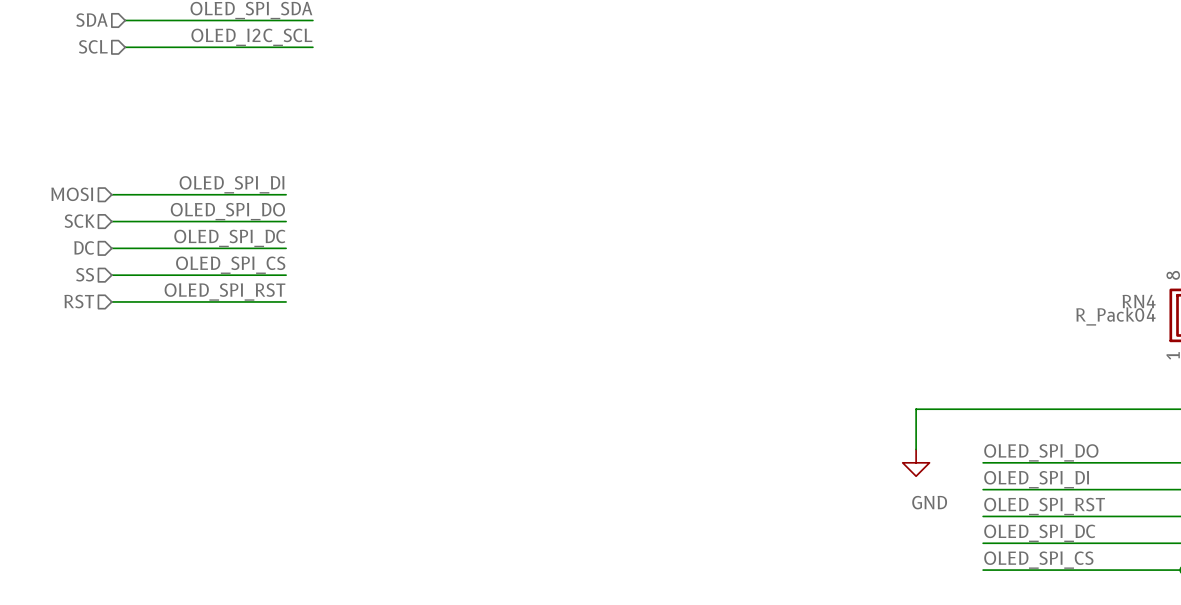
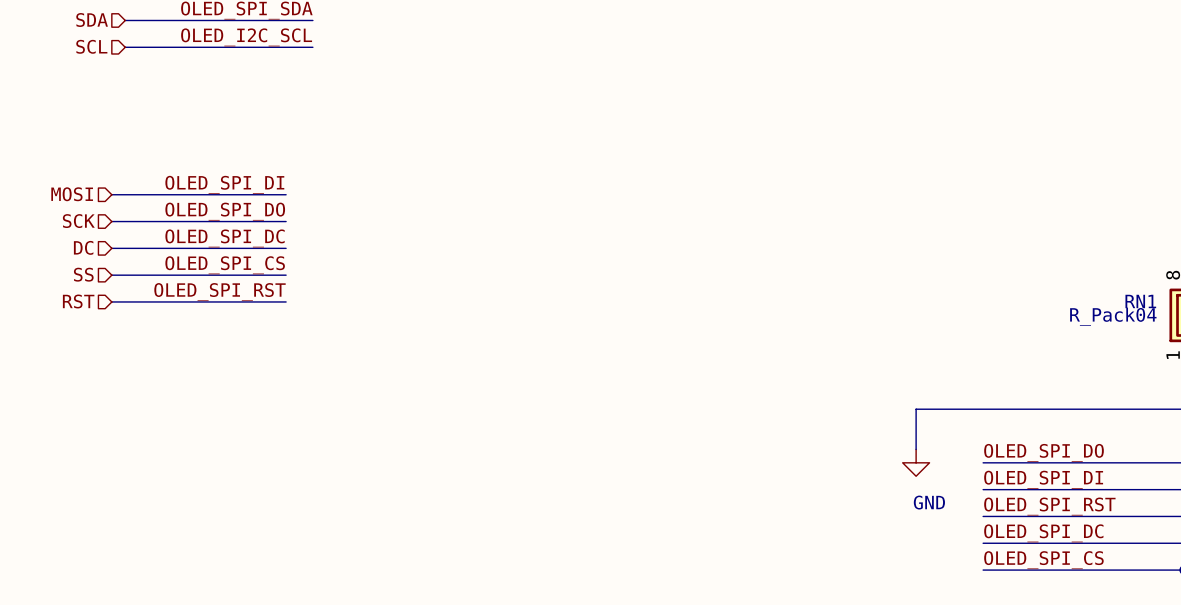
RN4 name: RN4 (1139, 301) -> RN1 (1140, 301)

